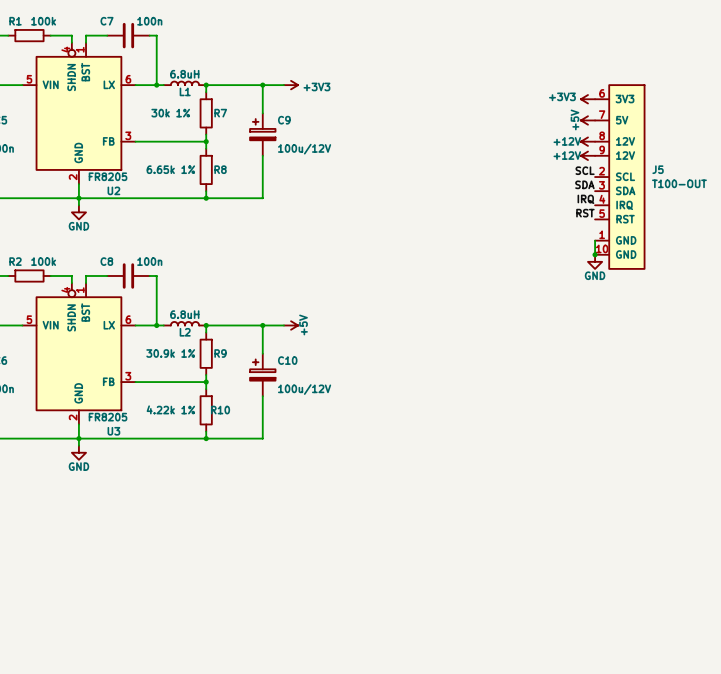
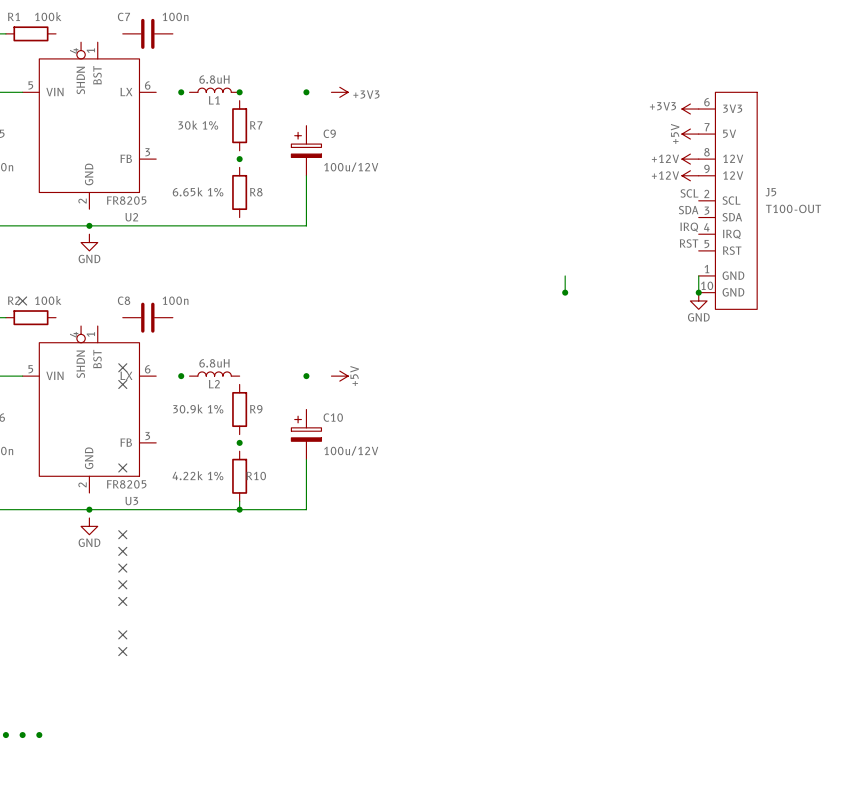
wire: (50, 35) (71, 35) (71, 42) -> none
wire: (107, 35) (86, 35) (86, 42) -> none
wire: (149, 35) (156, 35) (156, 85) -> none
wire: (135, 85) (163, 85) -> none
wire: (262, 85) (262, 113) -> none
wire: (283, 85) (206, 85) (206, 92) -> none
wire: (206, 134) (206, 148) -> none
wire: (135, 141) (206, 141) -> none
wire: (78, 184) (78, 205) -> none
wire: (206, 191) (206, 198) -> none
junction: (206, 198) -> none
wire: none -> (565, 275) (565, 292)
junction: none -> (565, 292)
no-connect mark: none -> (22, 300)
wire: (50, 275) (71, 275) (71, 283) -> none
wire: (107, 275) (86, 275) (86, 283) -> none
wire: (149, 275) (156, 275) (156, 325) -> none
no-connect mark: none -> (122, 367)
wire: (135, 325) (163, 325) -> none
junction: (206, 325) -> none
wire: (262, 325) (262, 353) -> none
wire: (283, 325) (206, 325) (206, 332) -> none
no-connect mark: none -> (122, 384)
wire: (206, 374) (206, 389) -> none
wire: (135, 382) (206, 382) -> none
no-connect mark: none -> (122, 467)
wire: (78, 424) (78, 445) -> none
no-connect mark: none -> (122, 534)
no-connect mark: none -> (122, 551)
no-connect mark: none -> (122, 568)
no-connect mark: none -> (122, 584)
no-connect mark: none -> (122, 601)
no-connect mark: none -> (122, 634)
no-connect mark: none -> (122, 651)
junction: none -> (5, 735)
junction: none -> (22, 735)
junction: none -> (39, 735)

